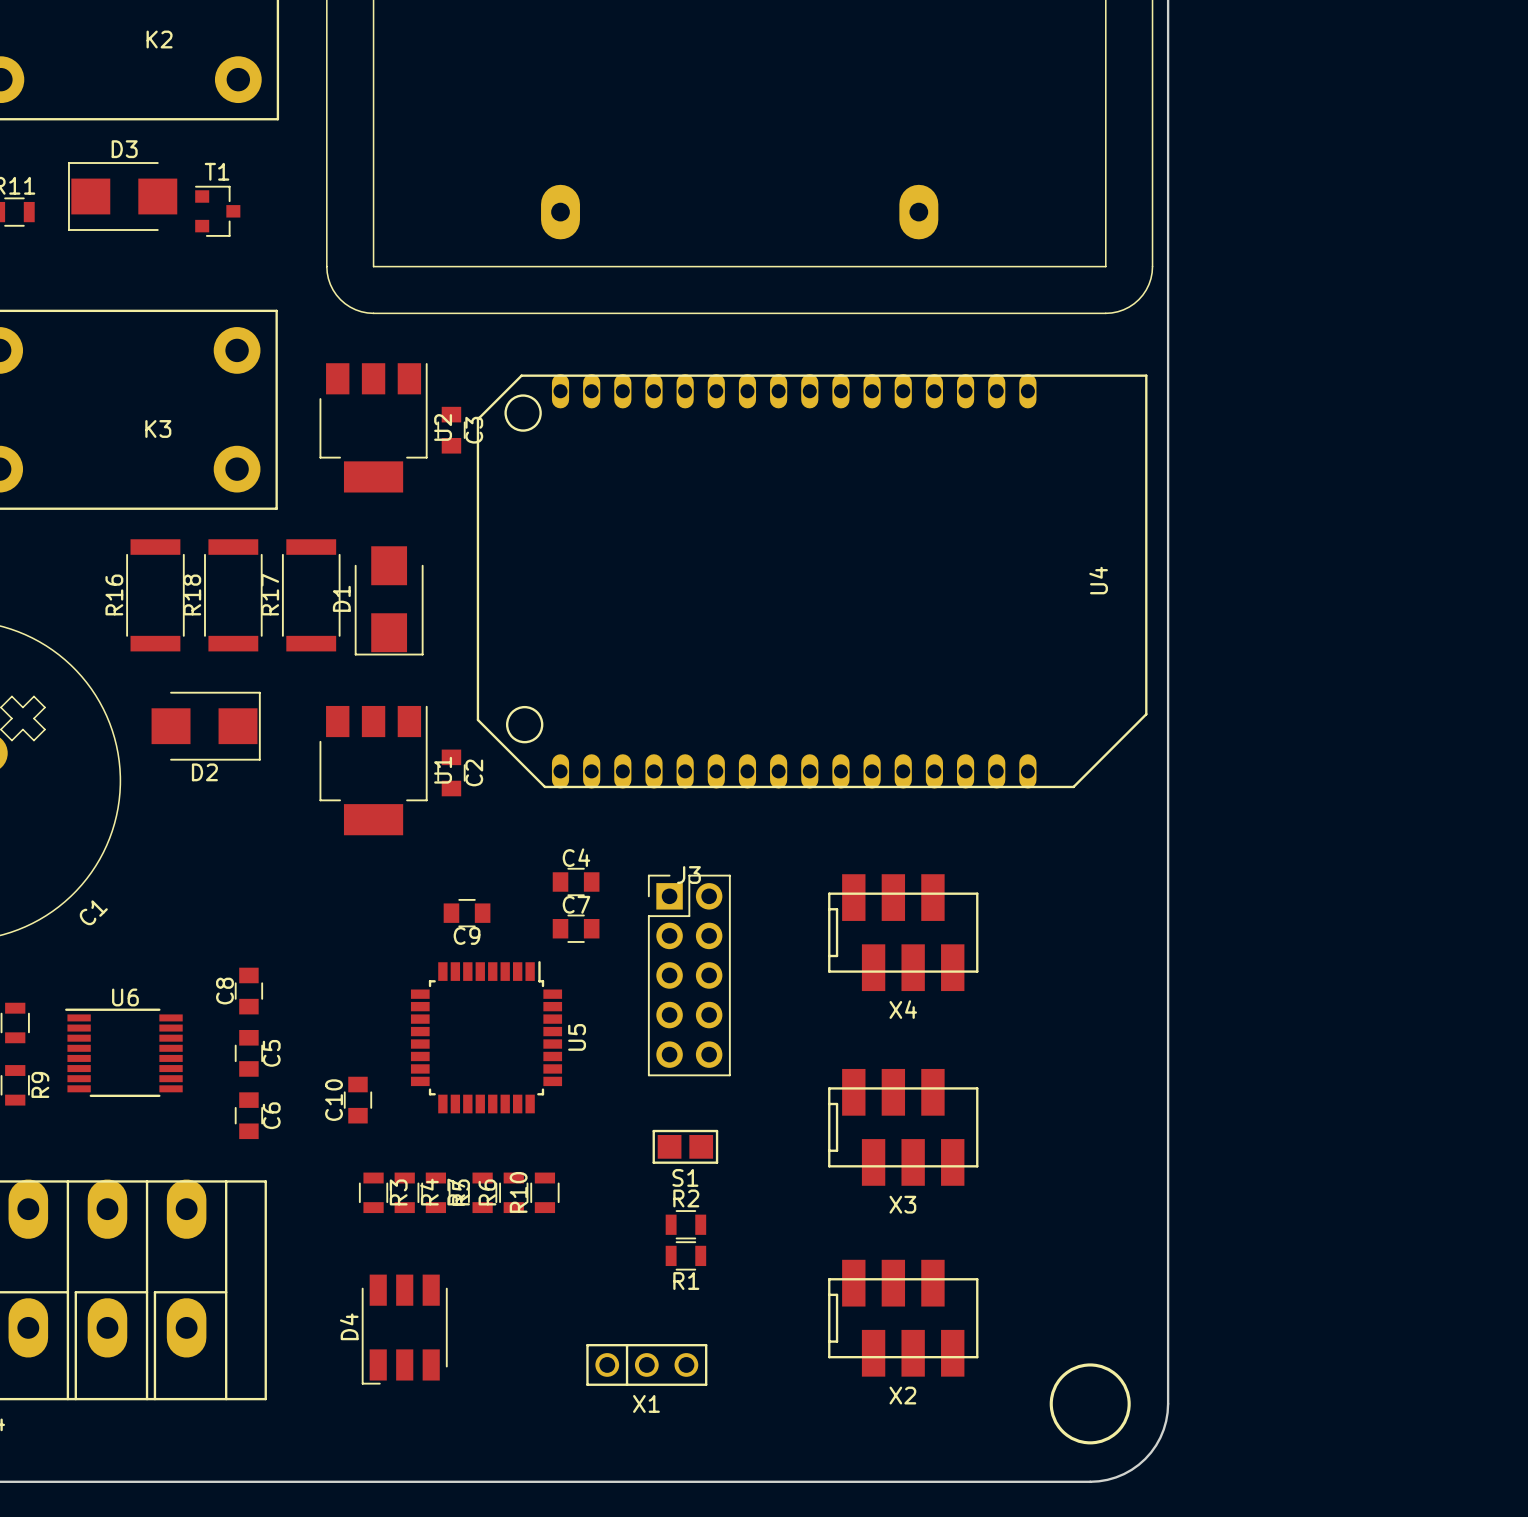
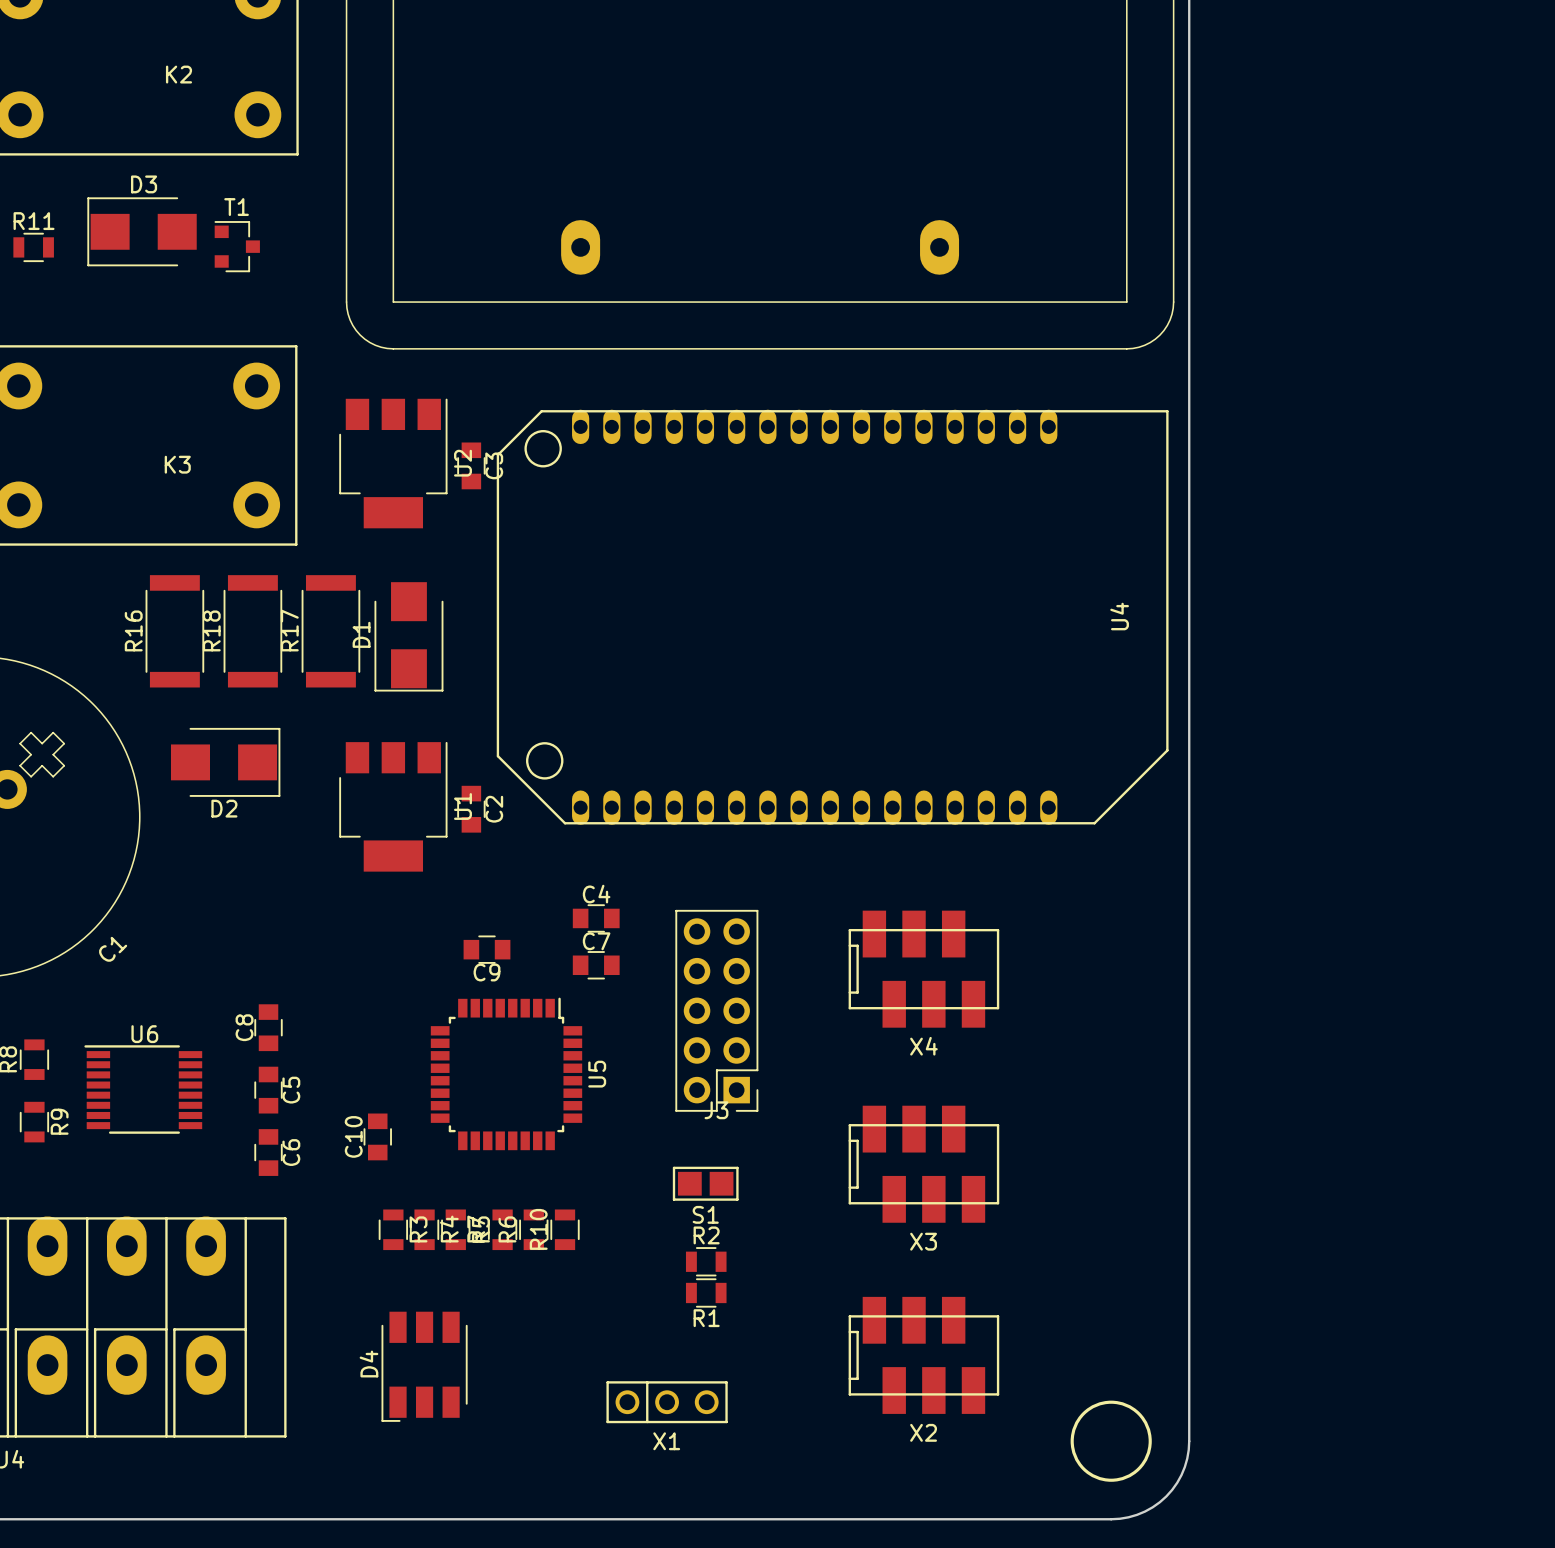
J3 rotation: 0° (689, 975) -> 180° (716, 1010)

